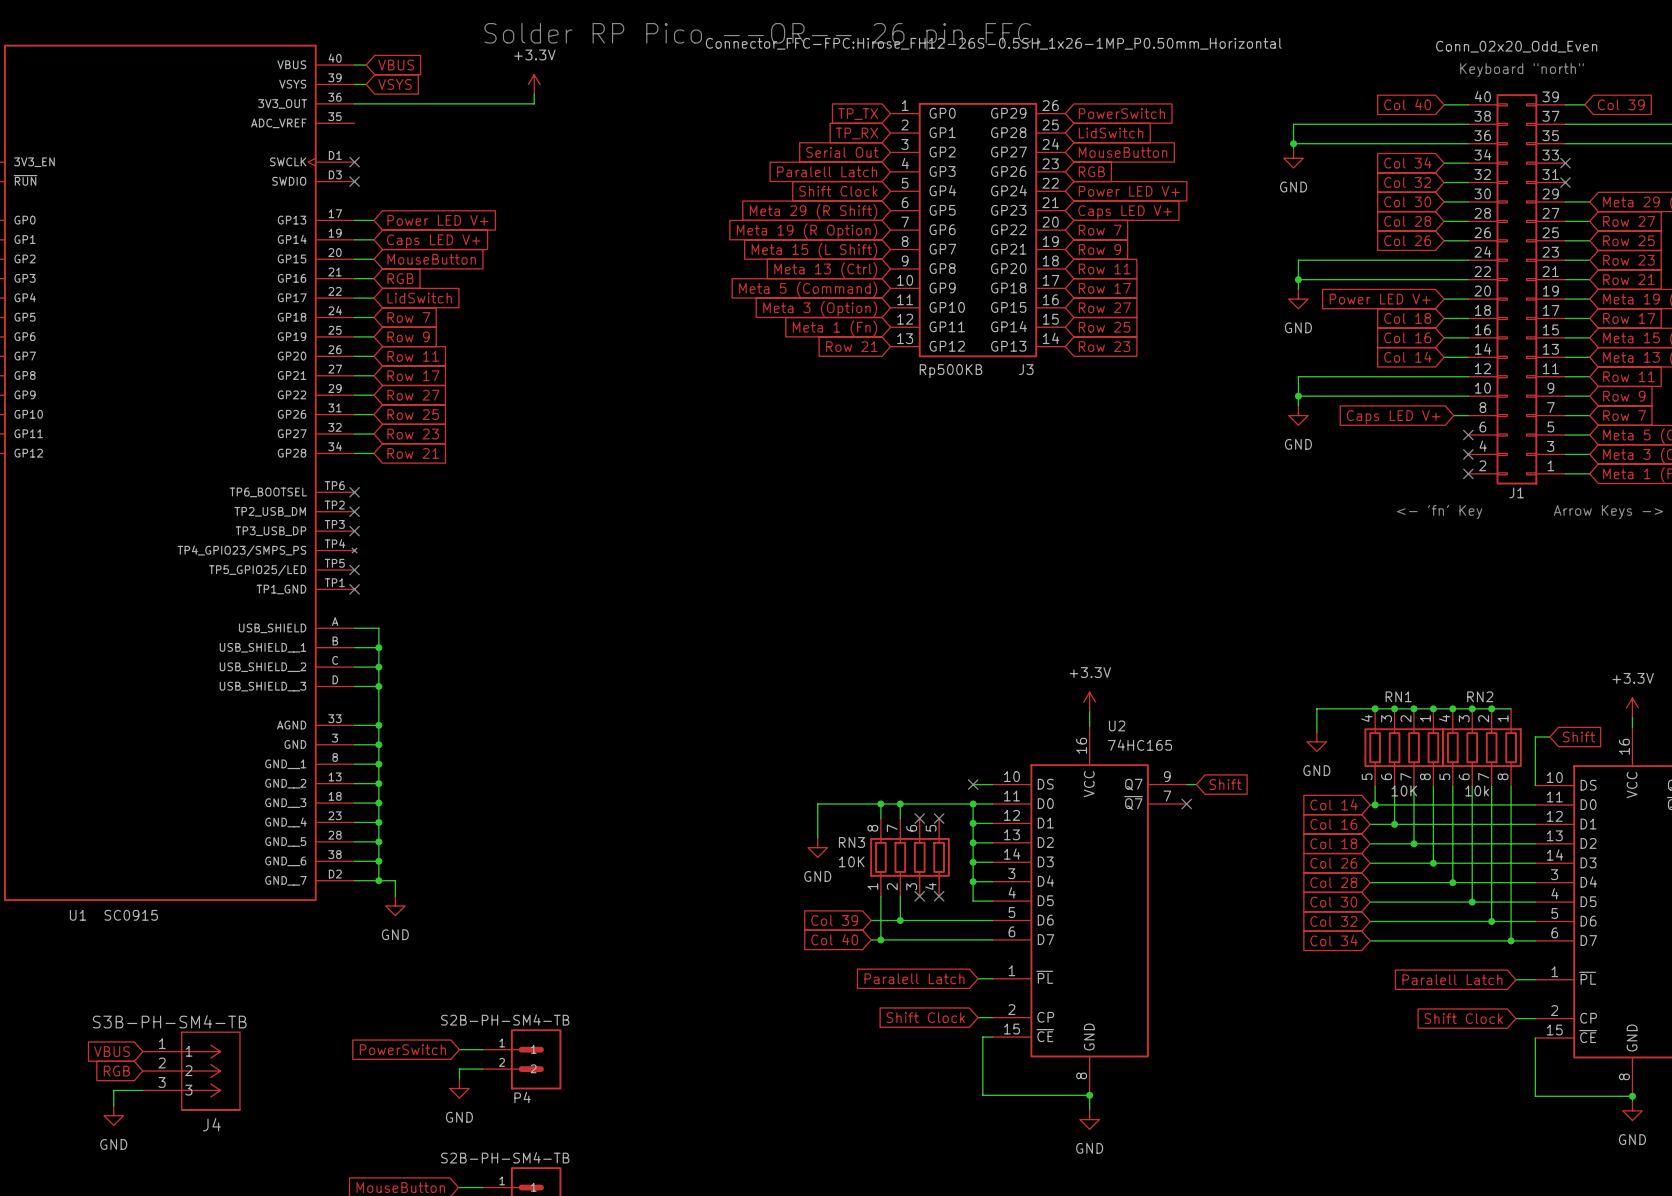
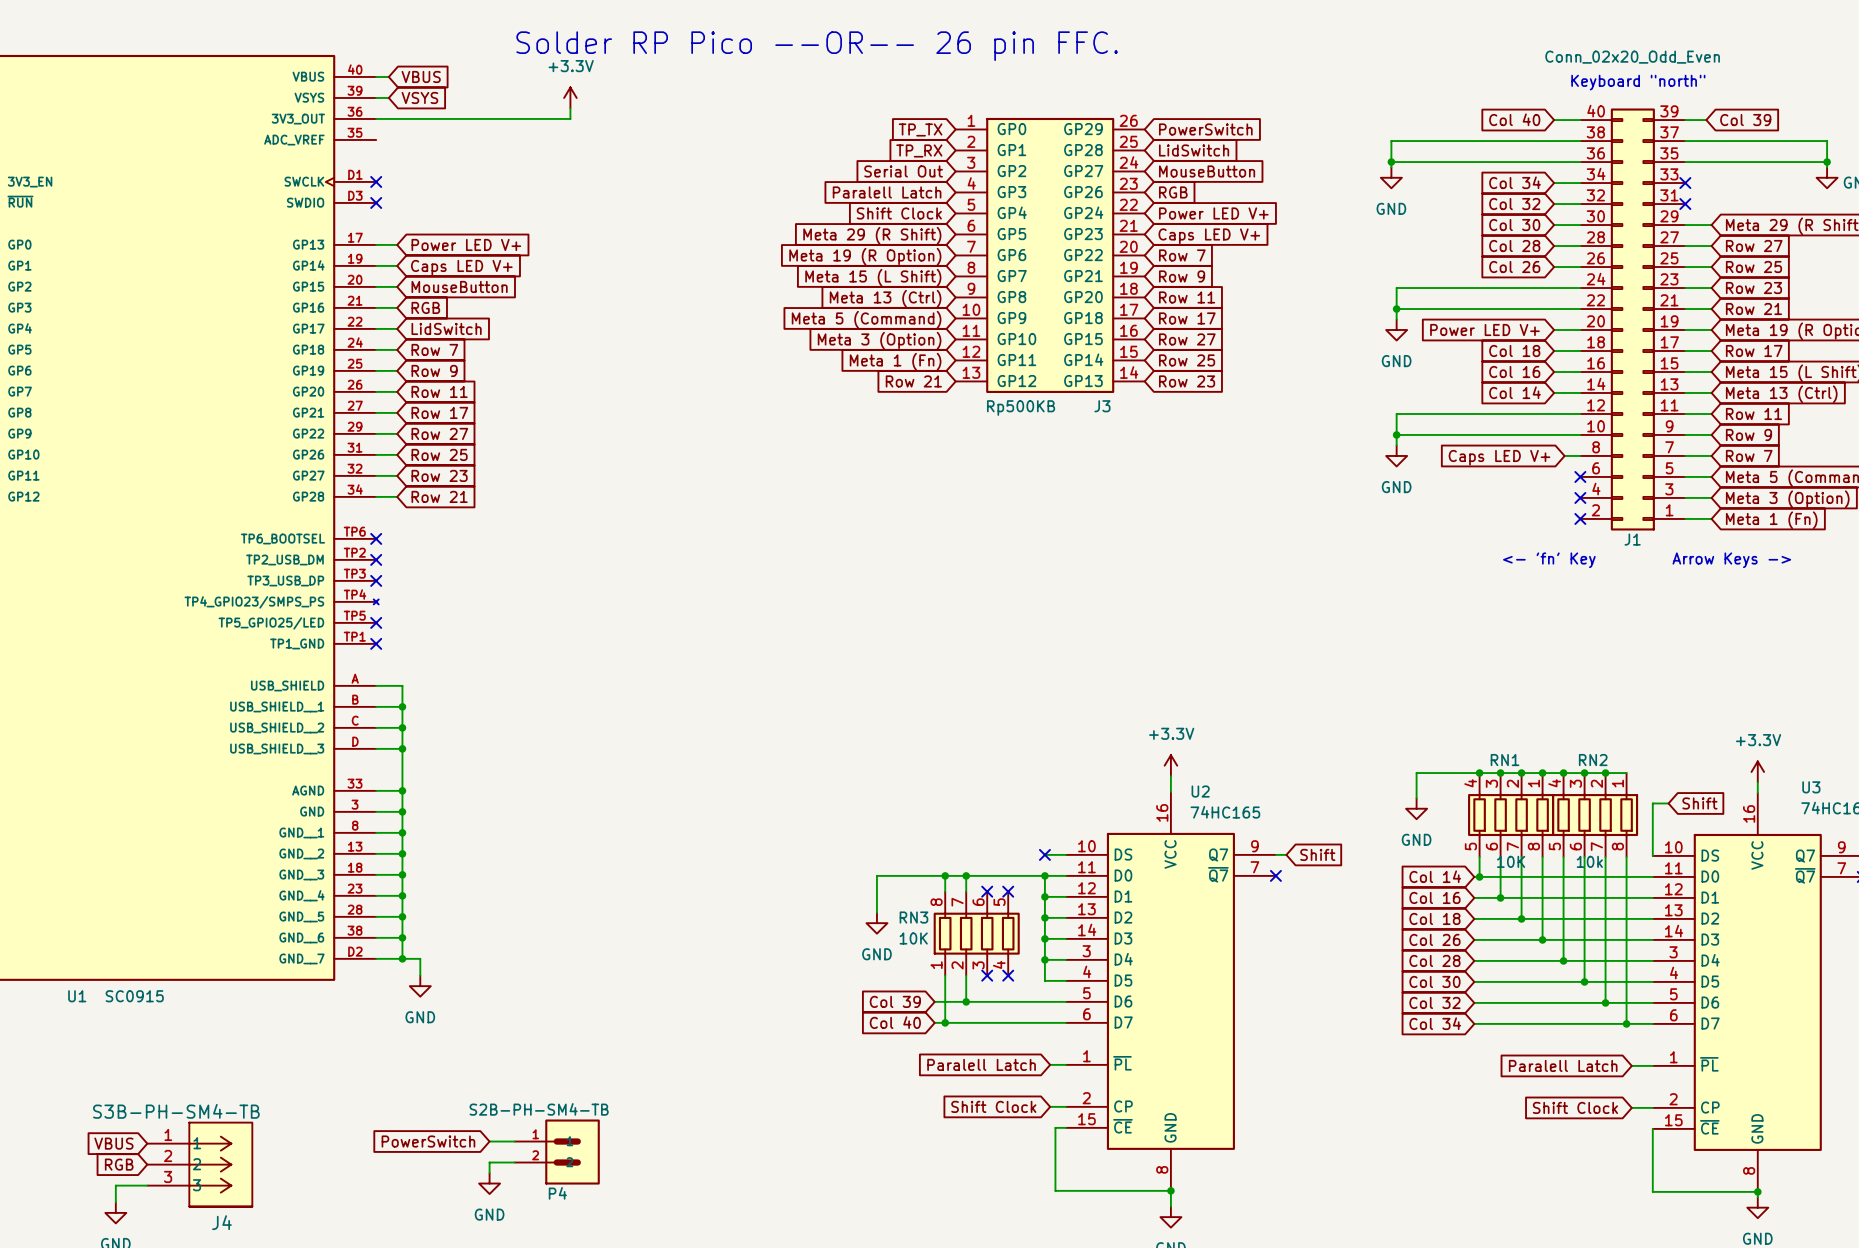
J3 text: Connector_FFC-FPC:Hirose_FH12-26S-0.5SH_1x26-1MP_P0.50mm_Horizontal (993, 43) -> none

